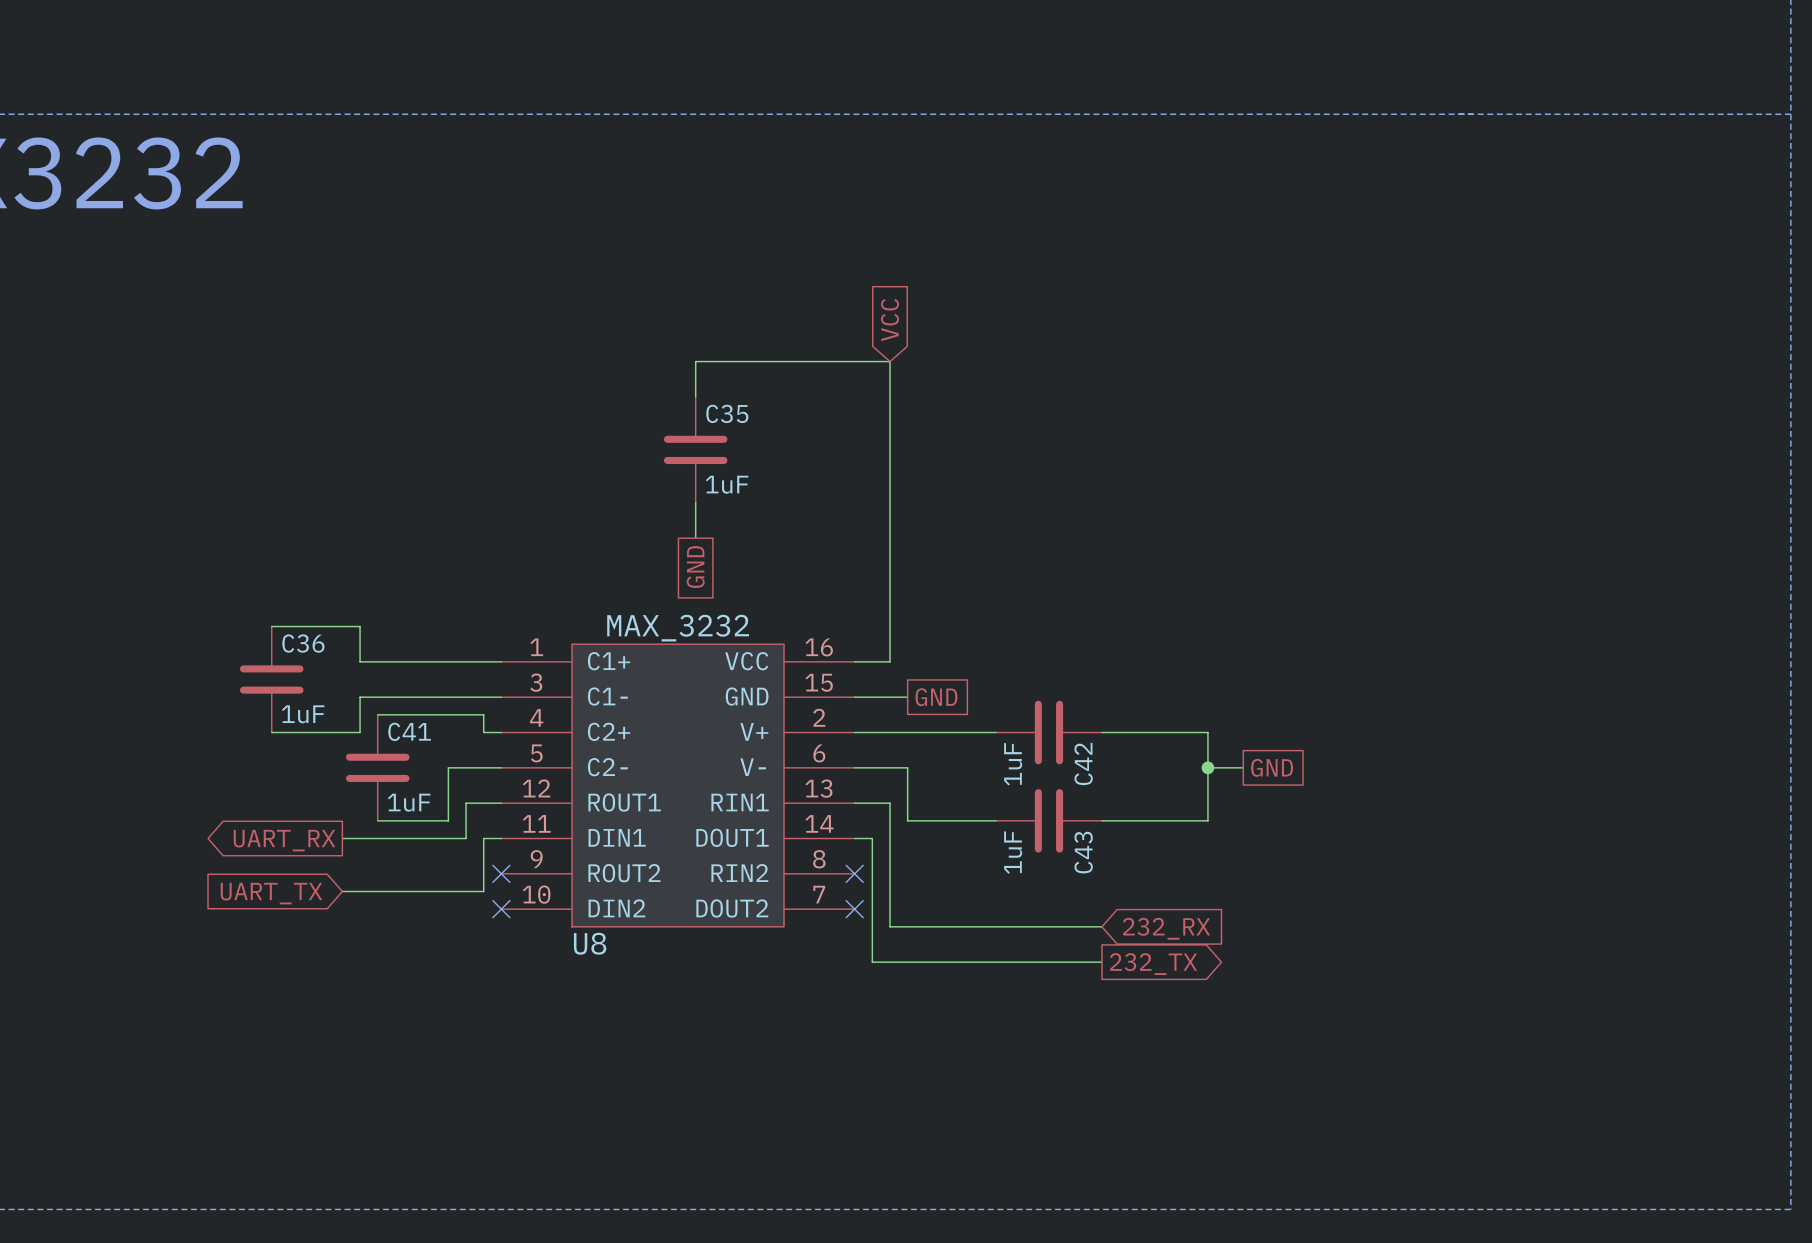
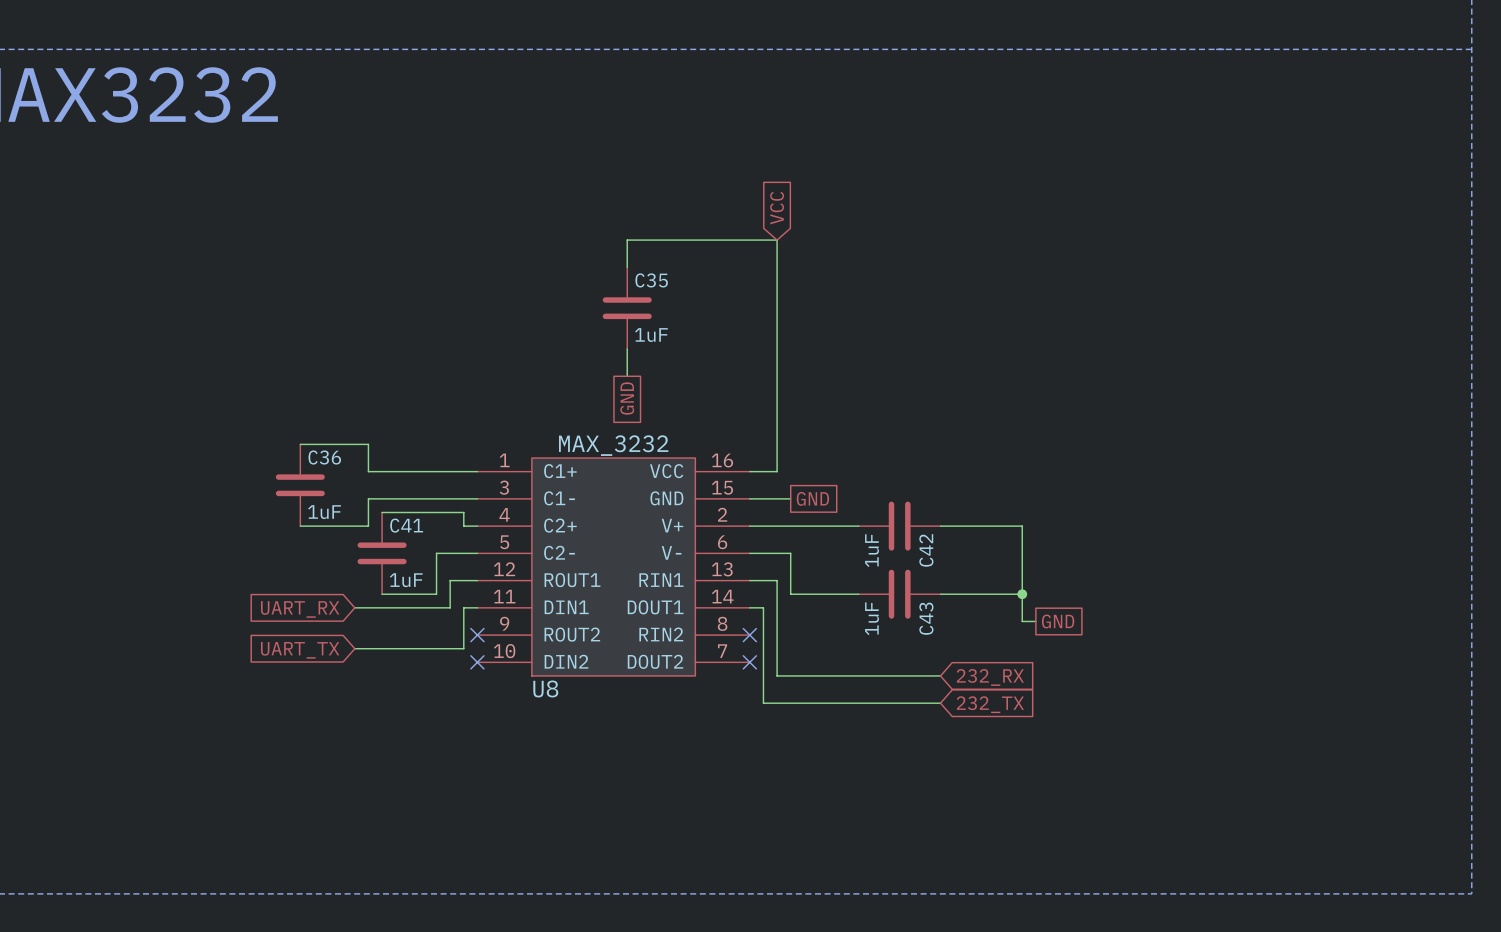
wire: (1207, 767) (1243, 767) -> none
junction position: (1207, 767) -> (1022, 594)
global label position: GND (1272, 767) -> GND (1058, 621)
wire: none -> (1022, 594) (1022, 621) (1035, 621)
global label shape: output (284, 840) -> input (300, 609)
global label shape: output (1153, 964) -> input (990, 704)

